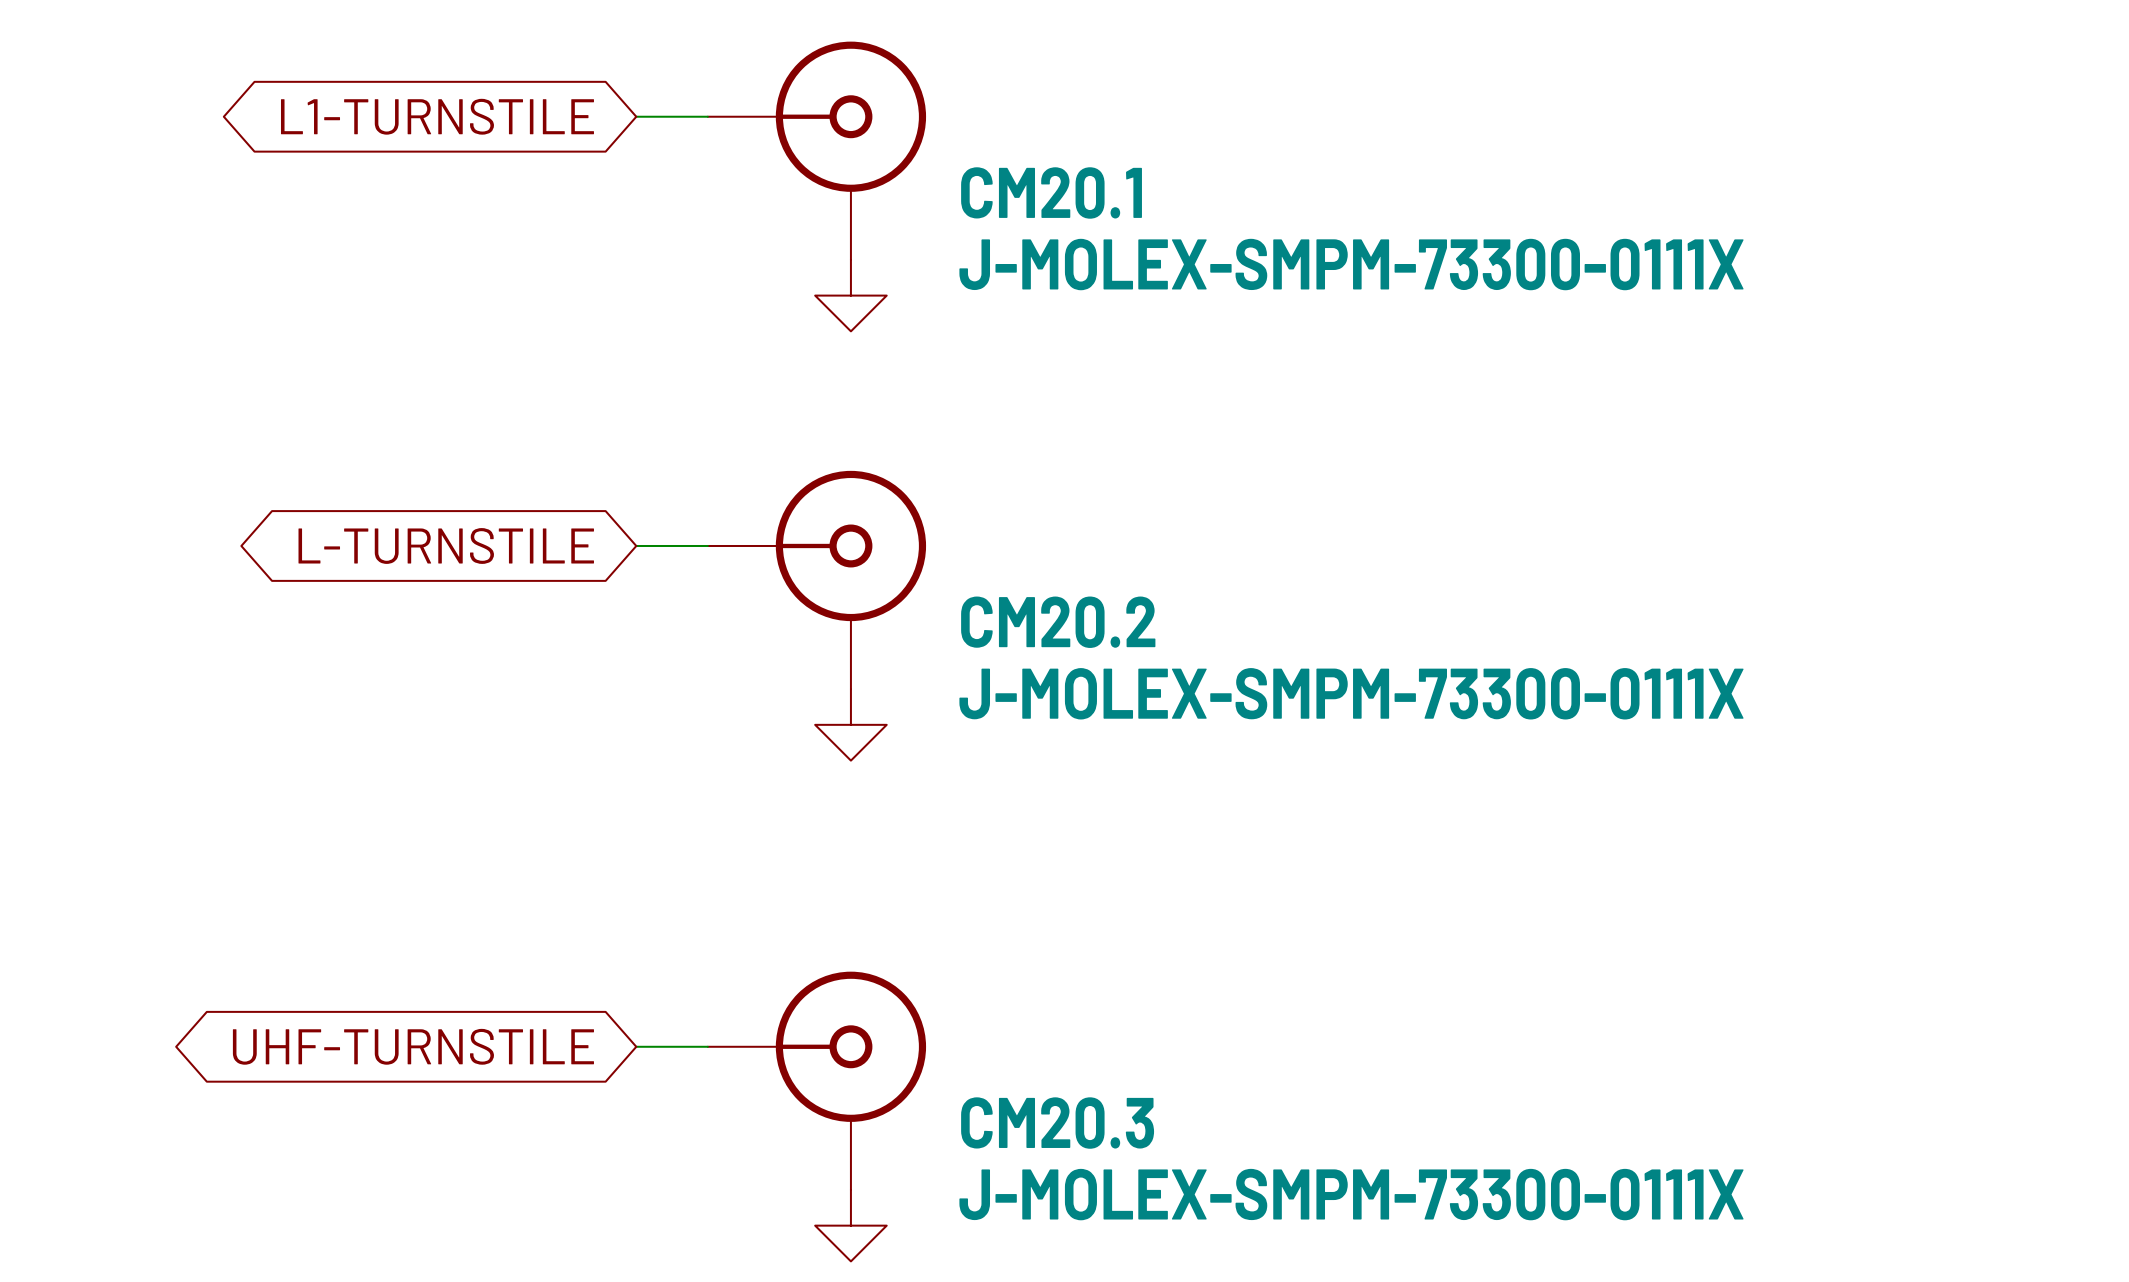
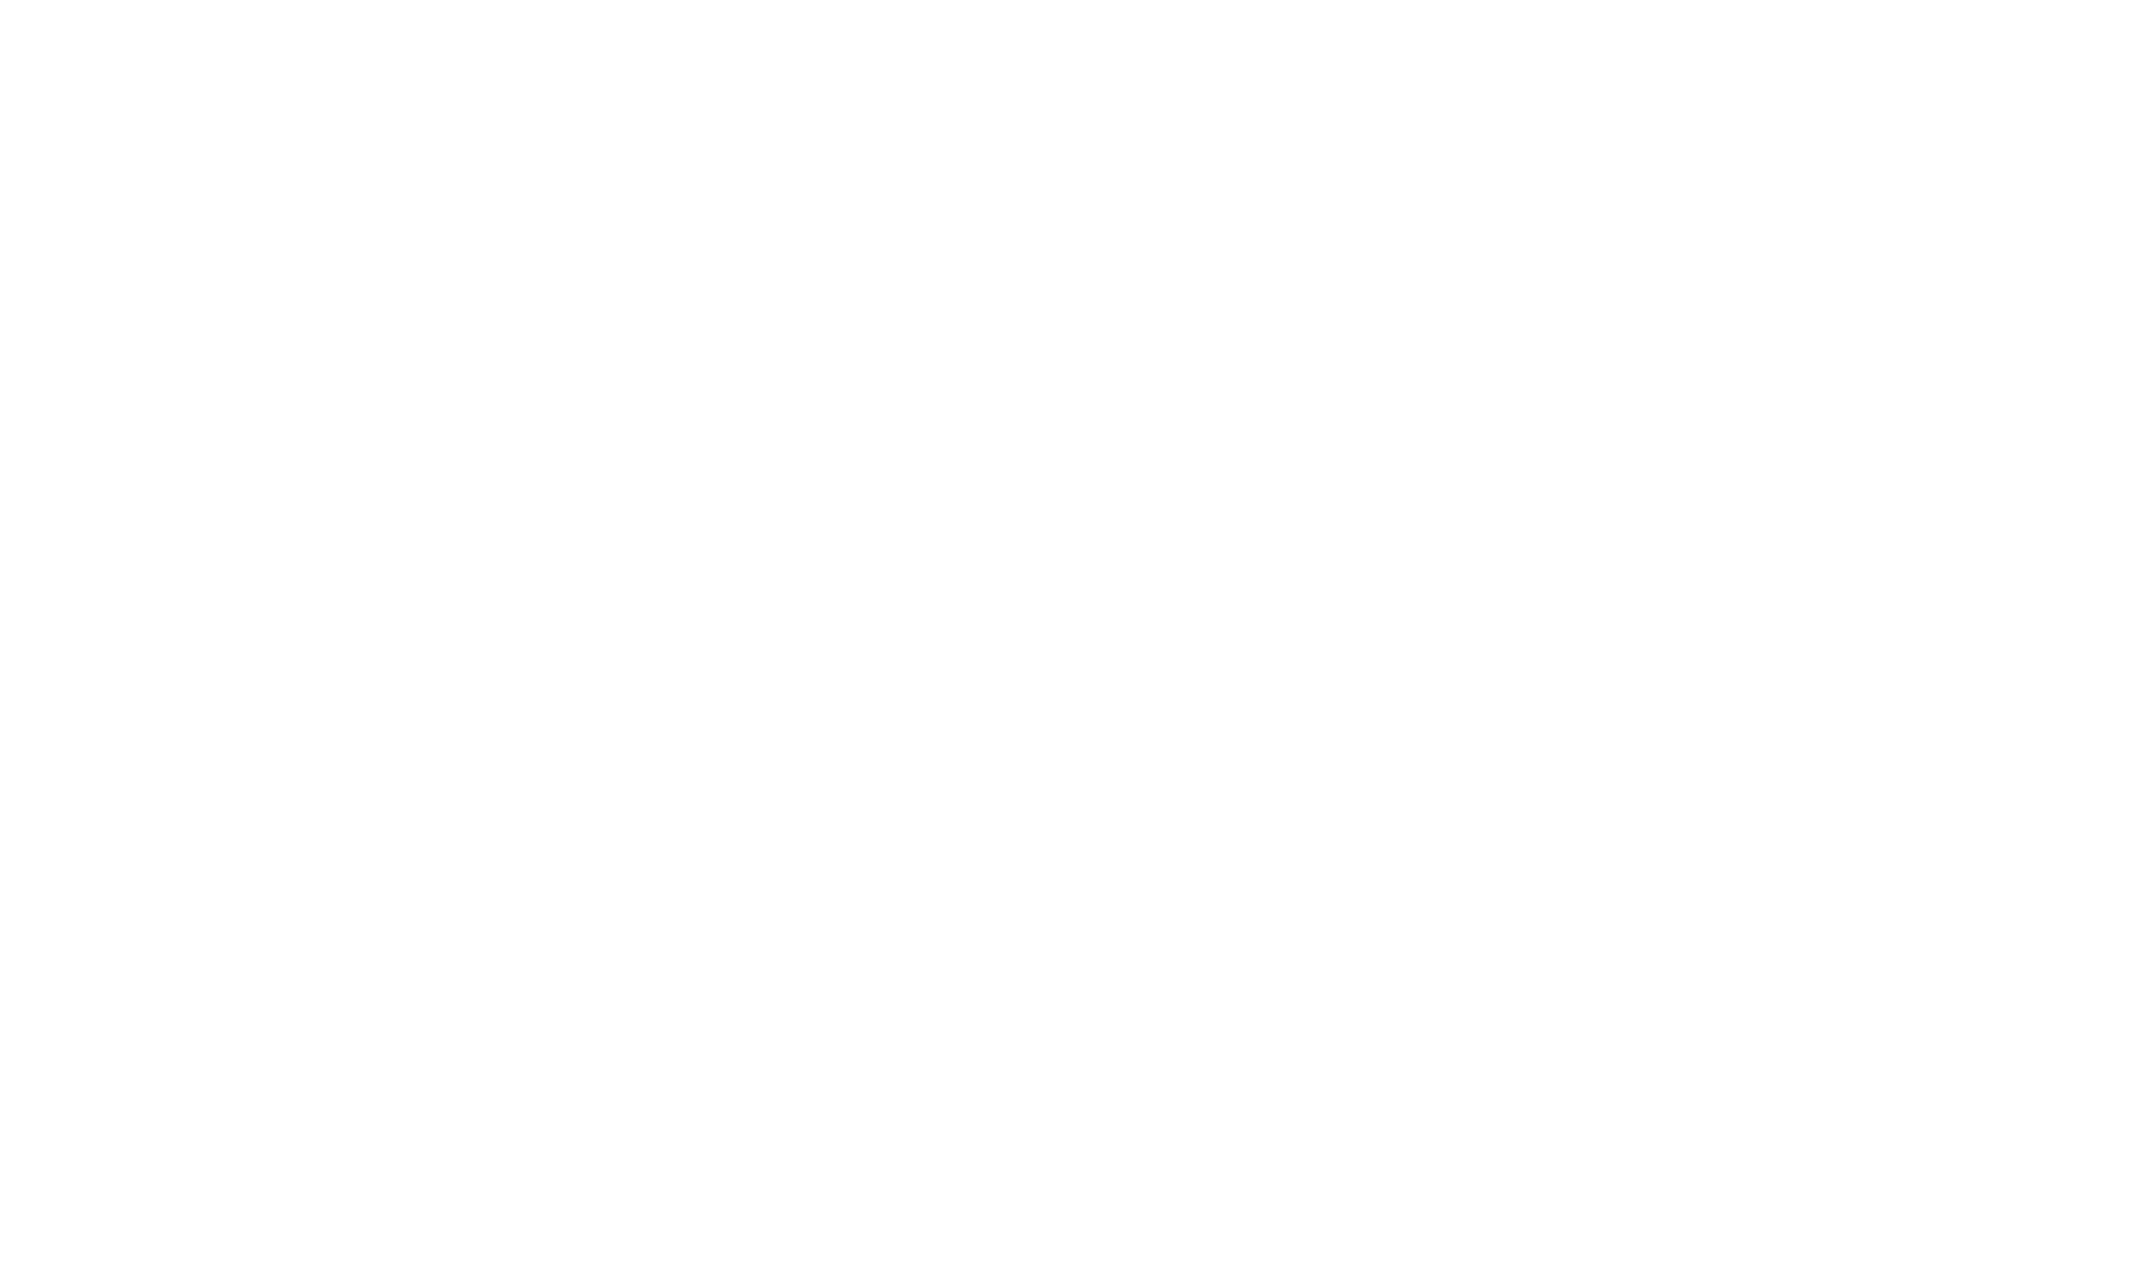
global label: L1-TURNSTILE (437, 116) -> none
wire: (636, 116) (707, 116) -> none
CM20.1: J-MOLEX-SMPM-73300-0111X (816, 150) -> none
power symbol: (850, 295) -> none
global label: L-TURNSTILE (446, 545) -> none
wire: (636, 545) (707, 545) -> none
CM20.2: J-MOLEX-SMPM-73300-0111X (816, 579) -> none
power symbol: (850, 724) -> none
global label: UHF-TURNSTILE (413, 1046) -> none
wire: (636, 1046) (707, 1046) -> none
CM20.3: J-MOLEX-SMPM-73300-0111X (816, 1080) -> none
power symbol: (850, 1225) -> none

